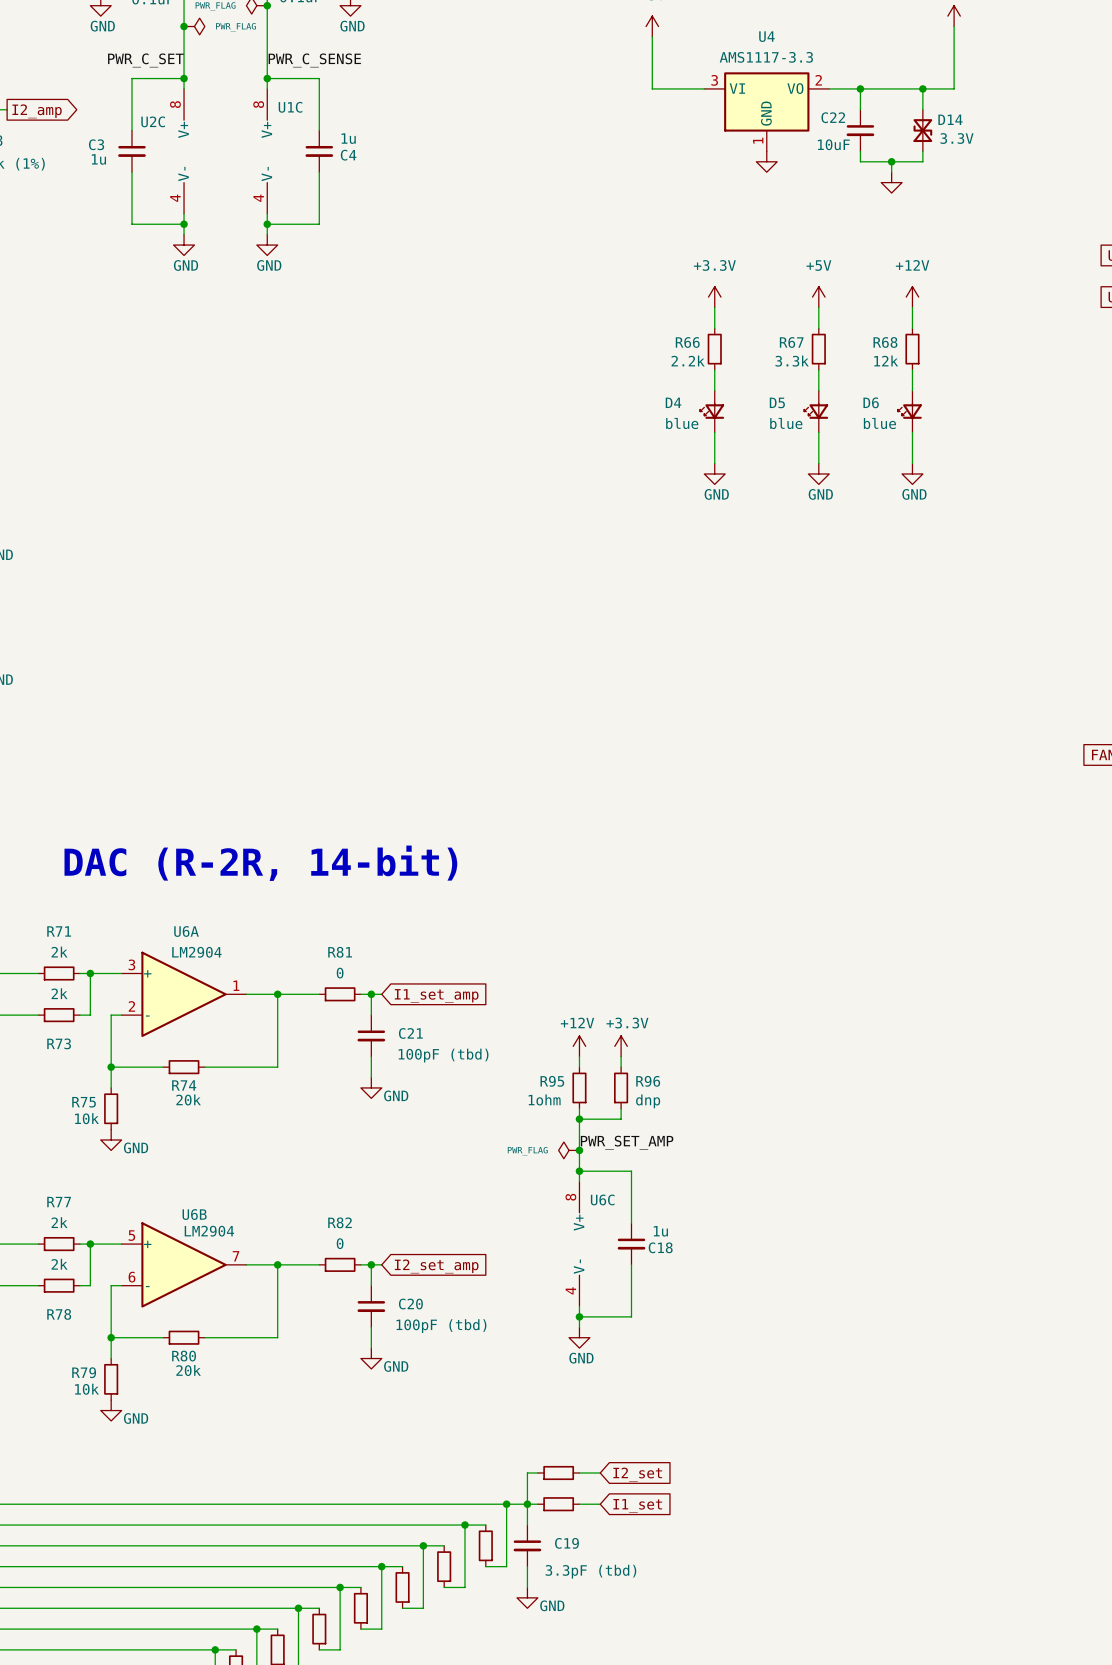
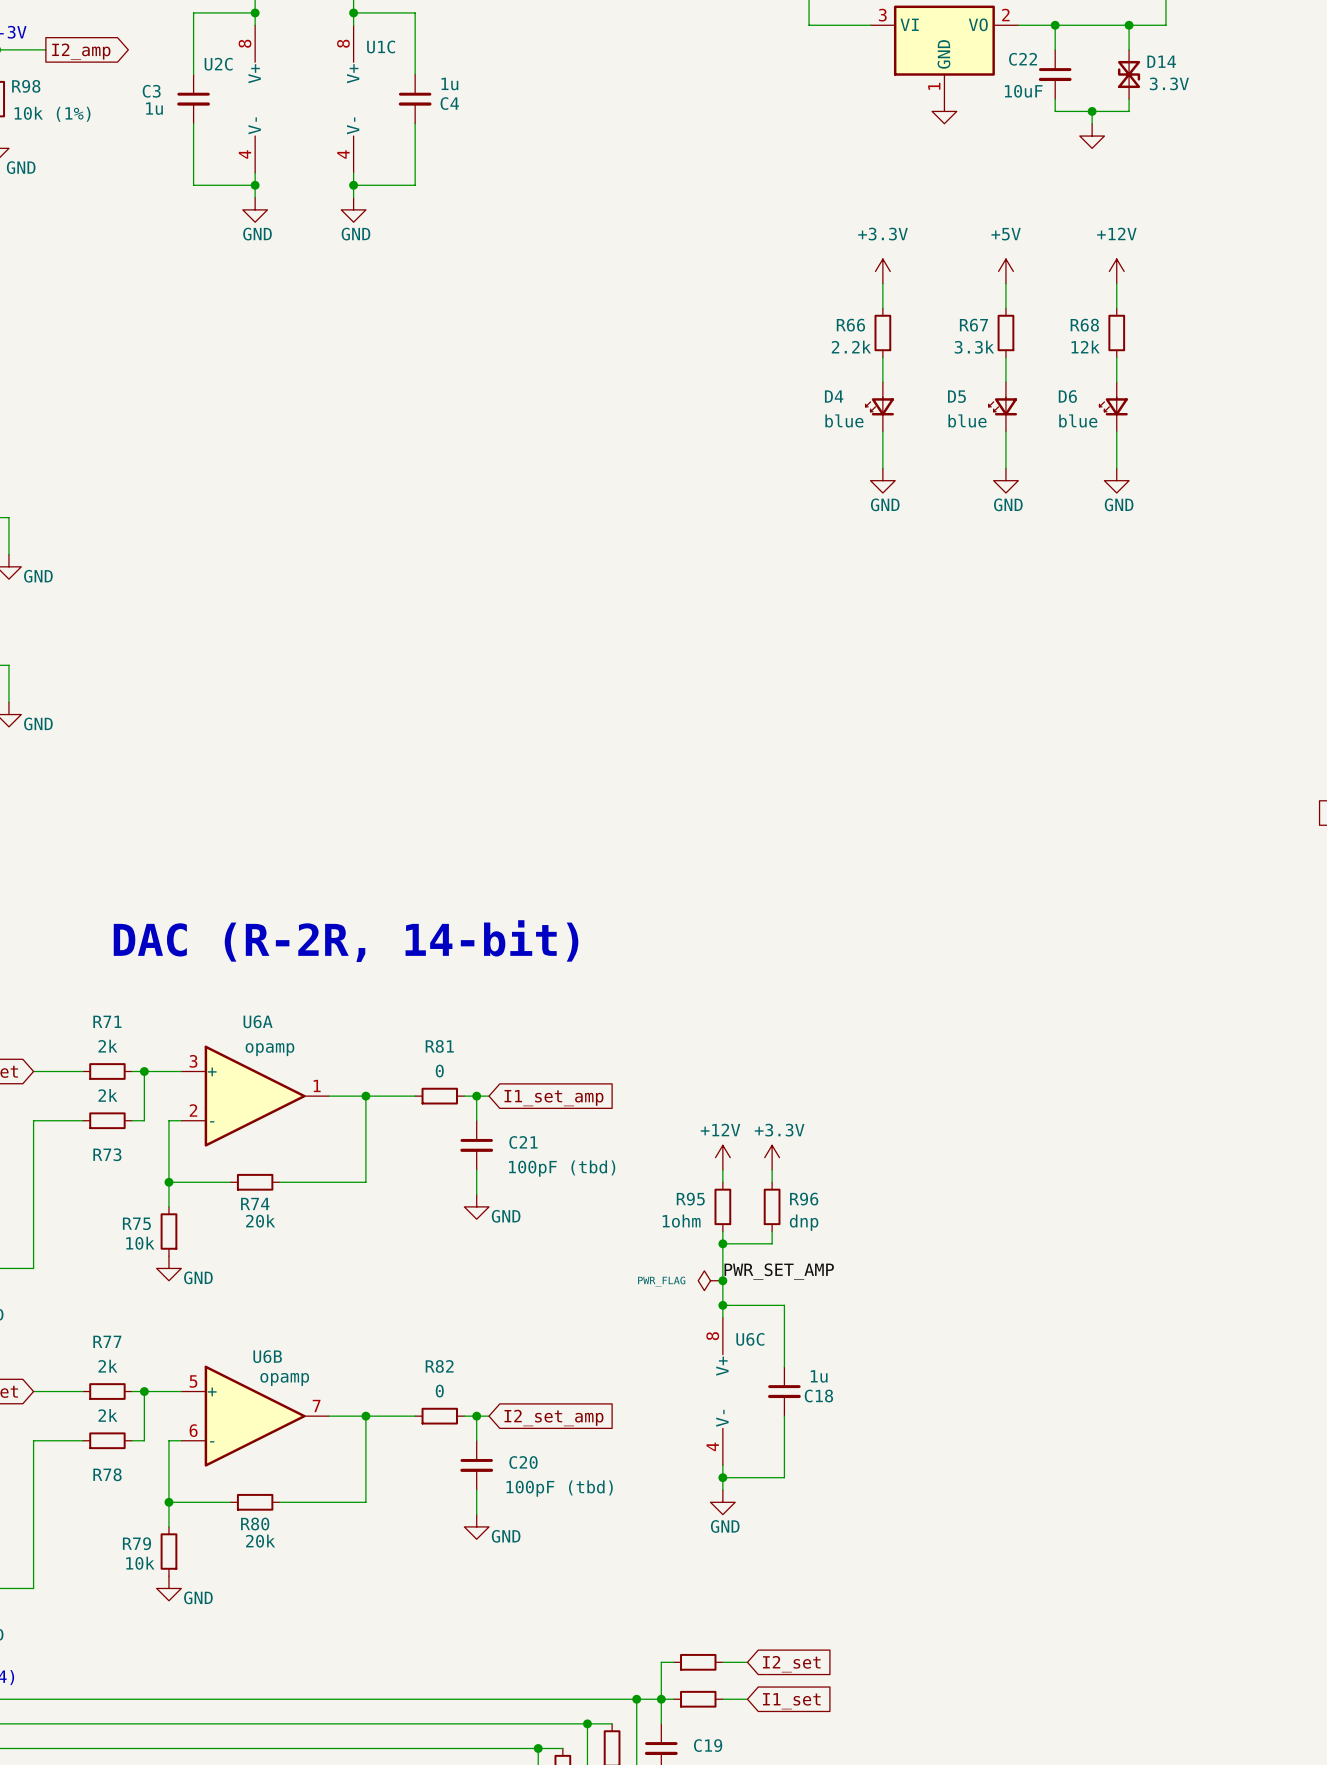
U6A value: LM2904 (196, 952) -> opamp (269, 1049)
U6B value: LM2904 (209, 1231) -> opamp (284, 1379)

